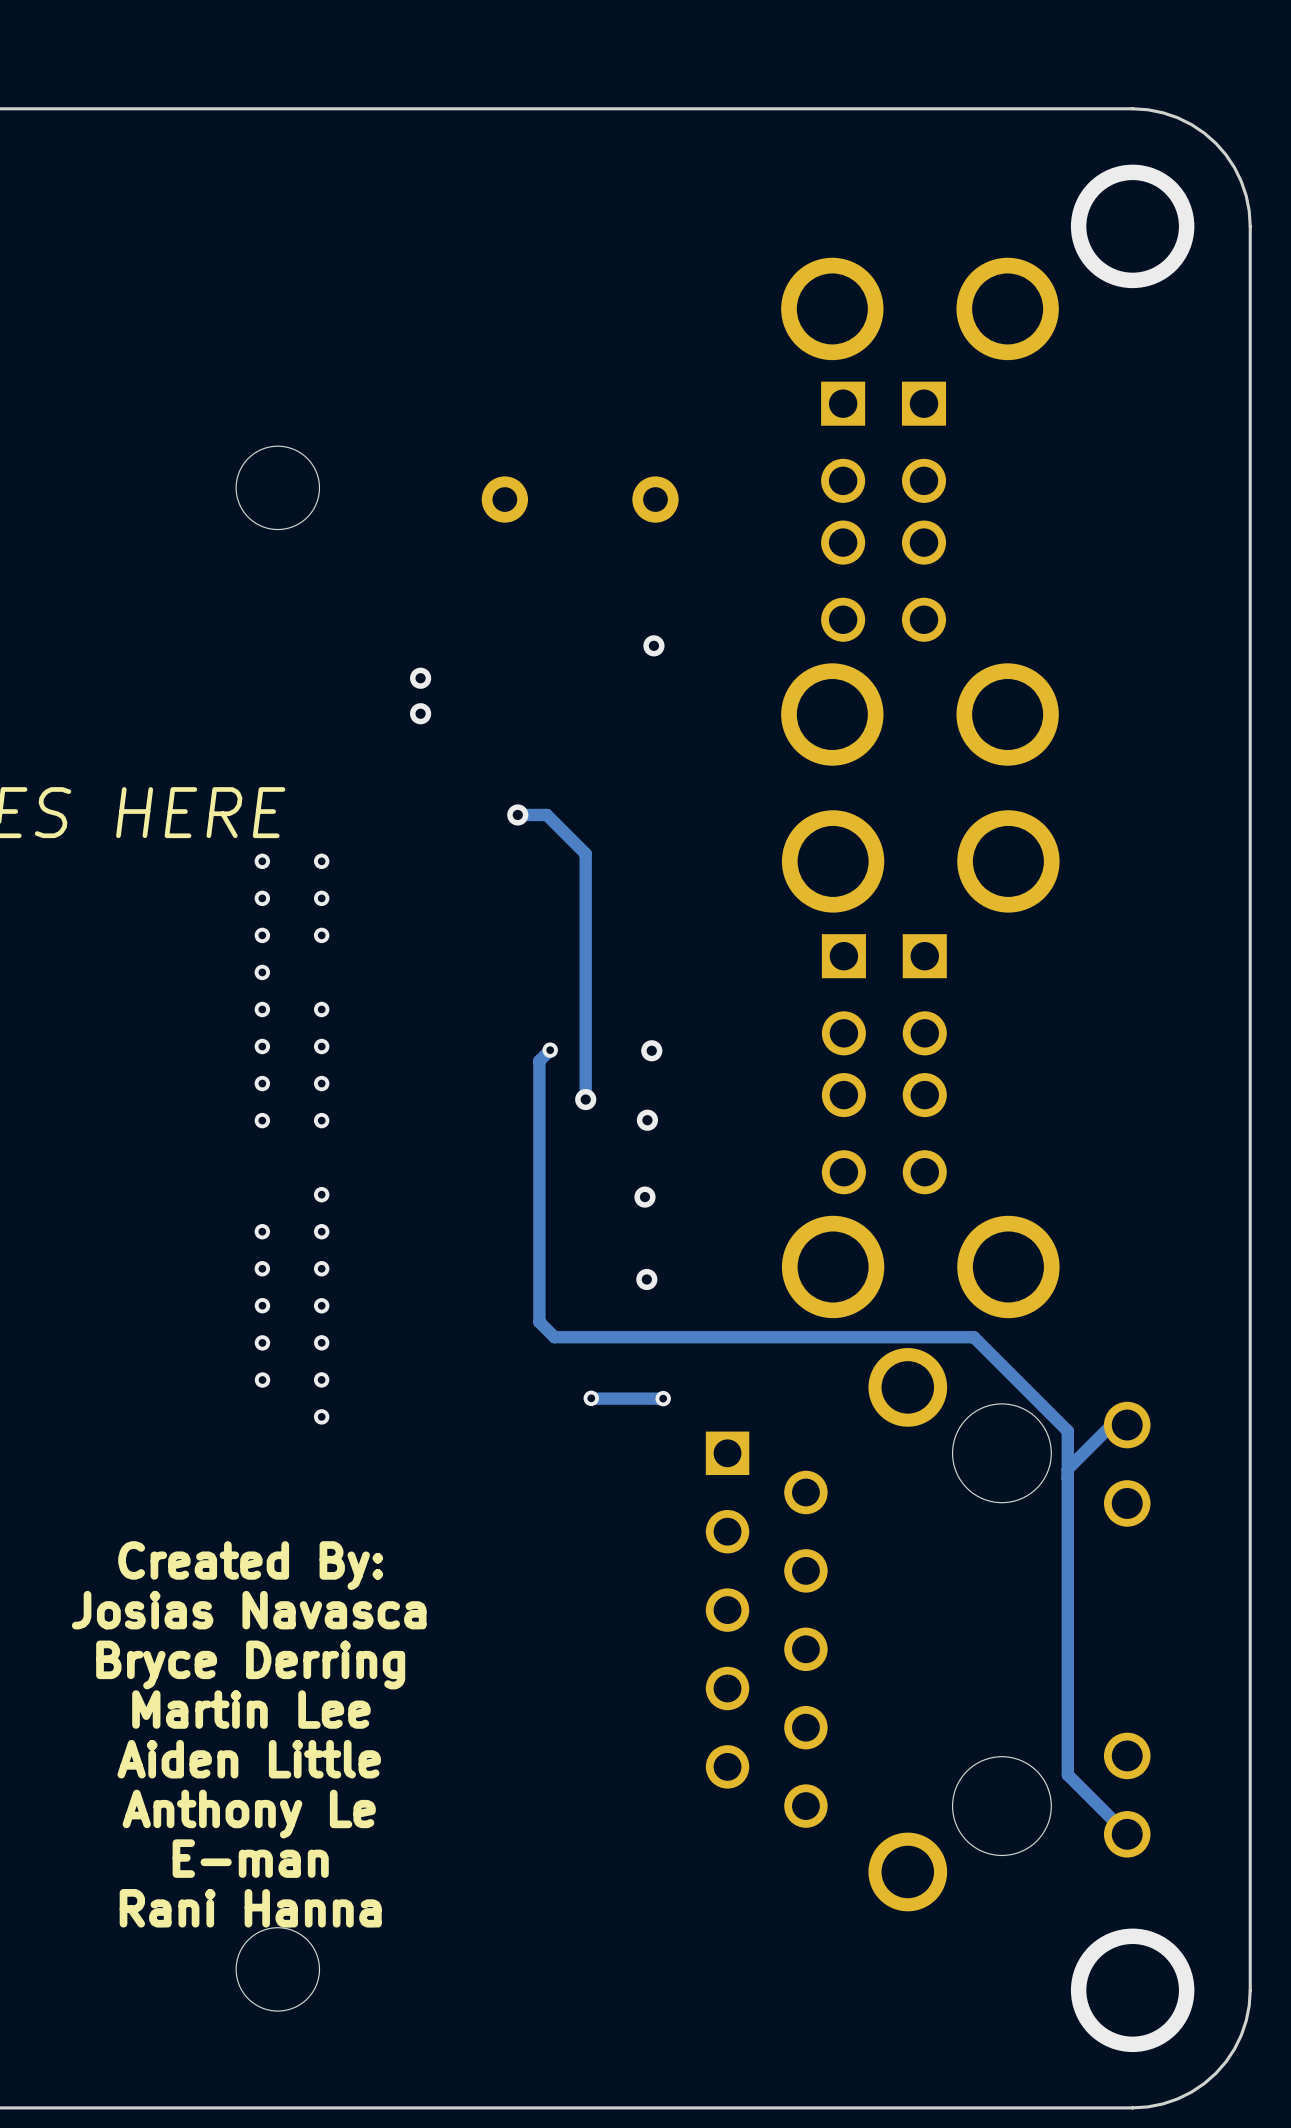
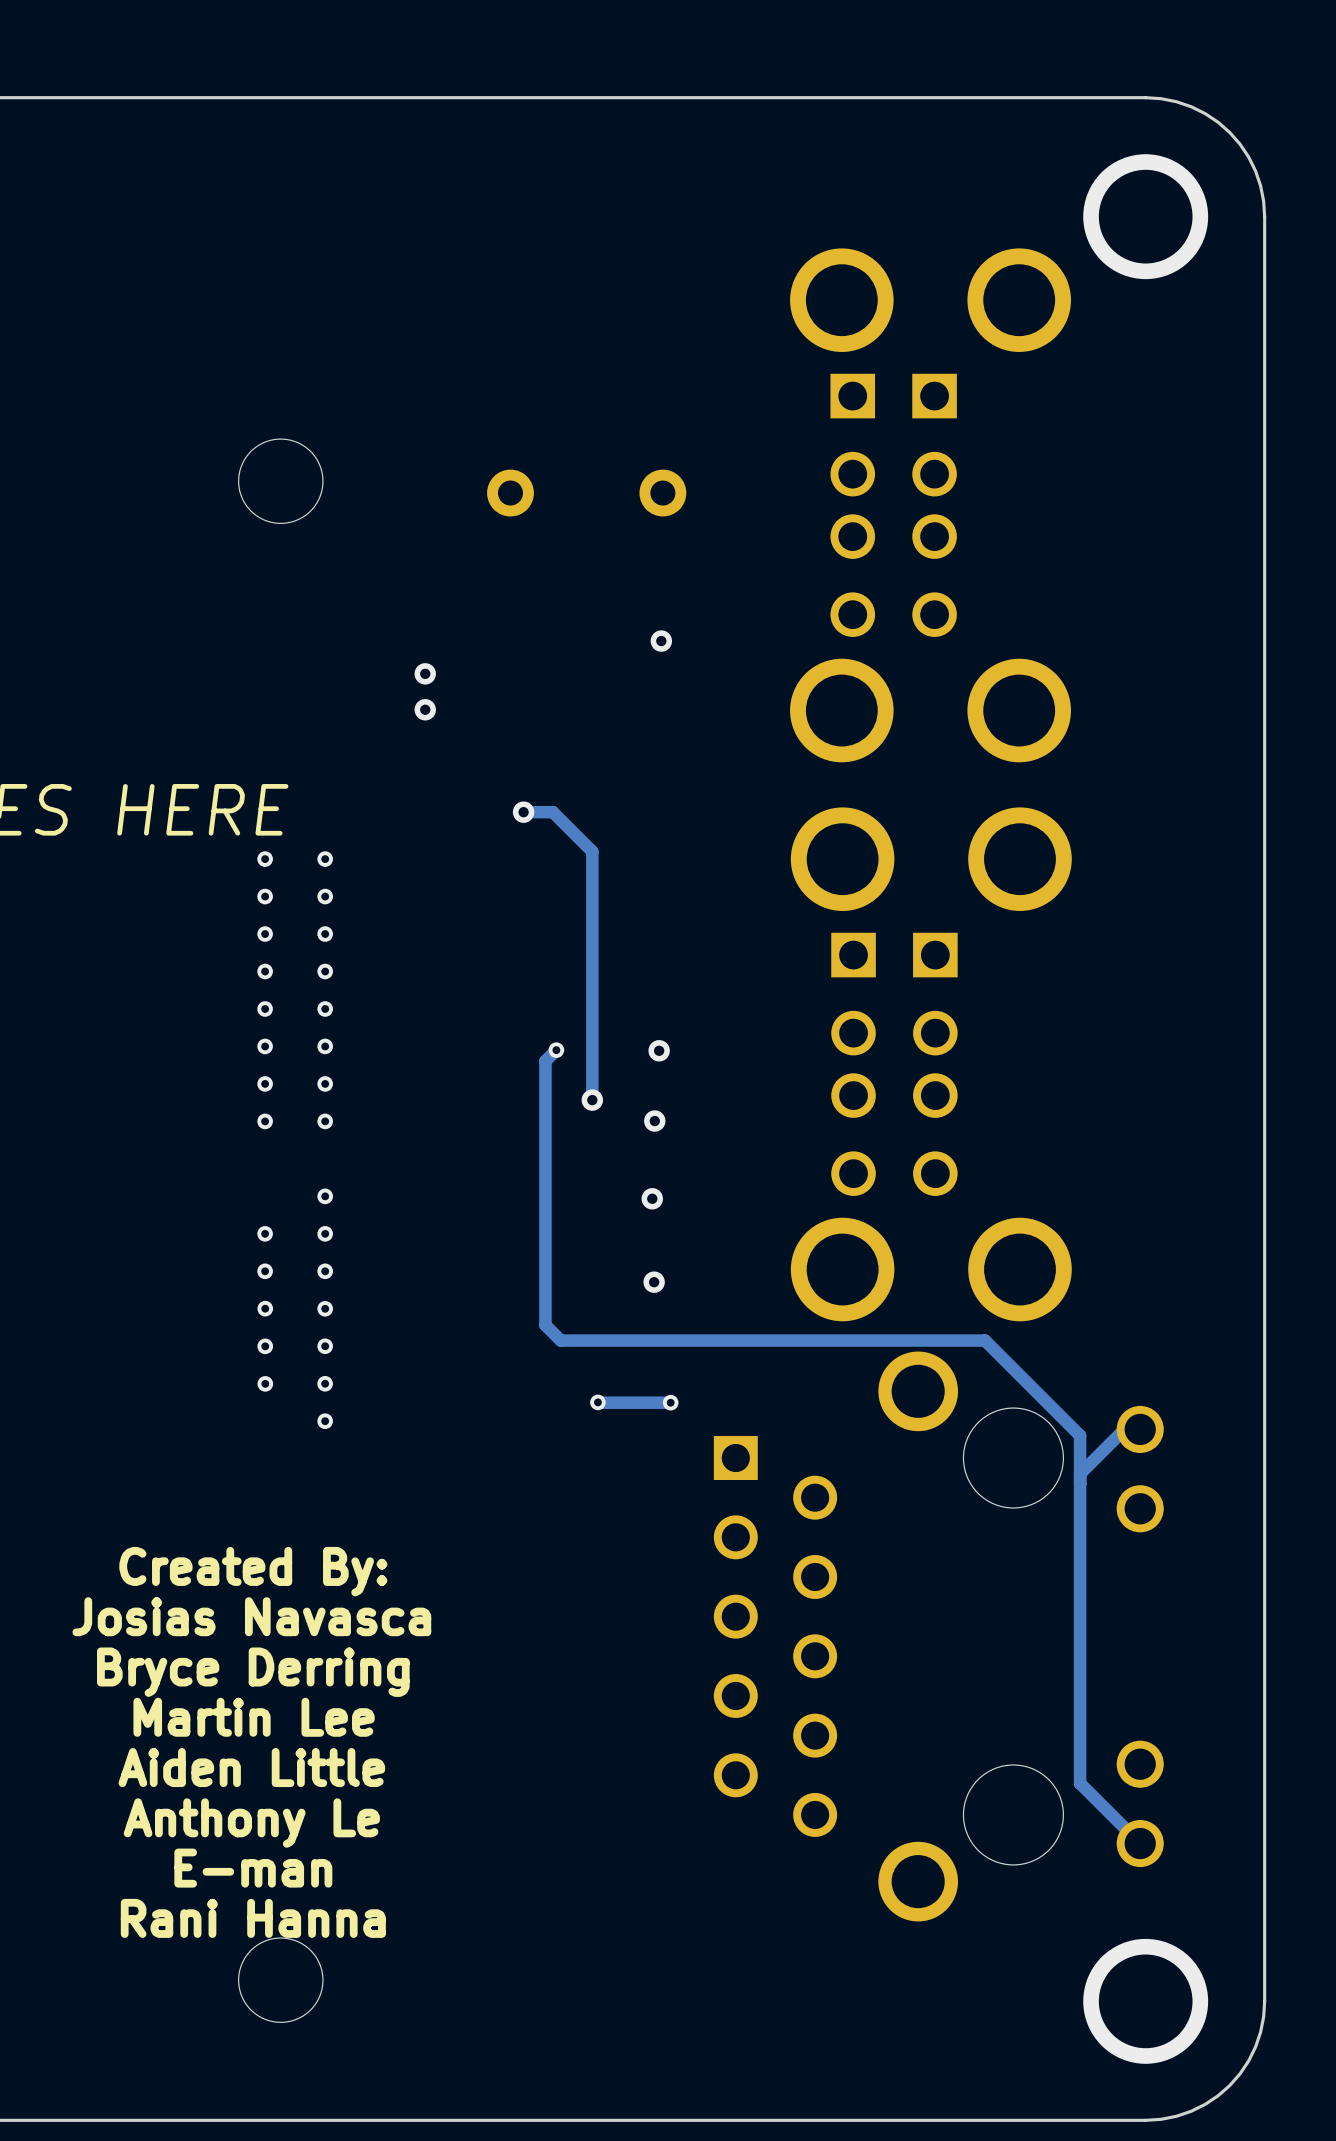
via: none -> (325, 971)

